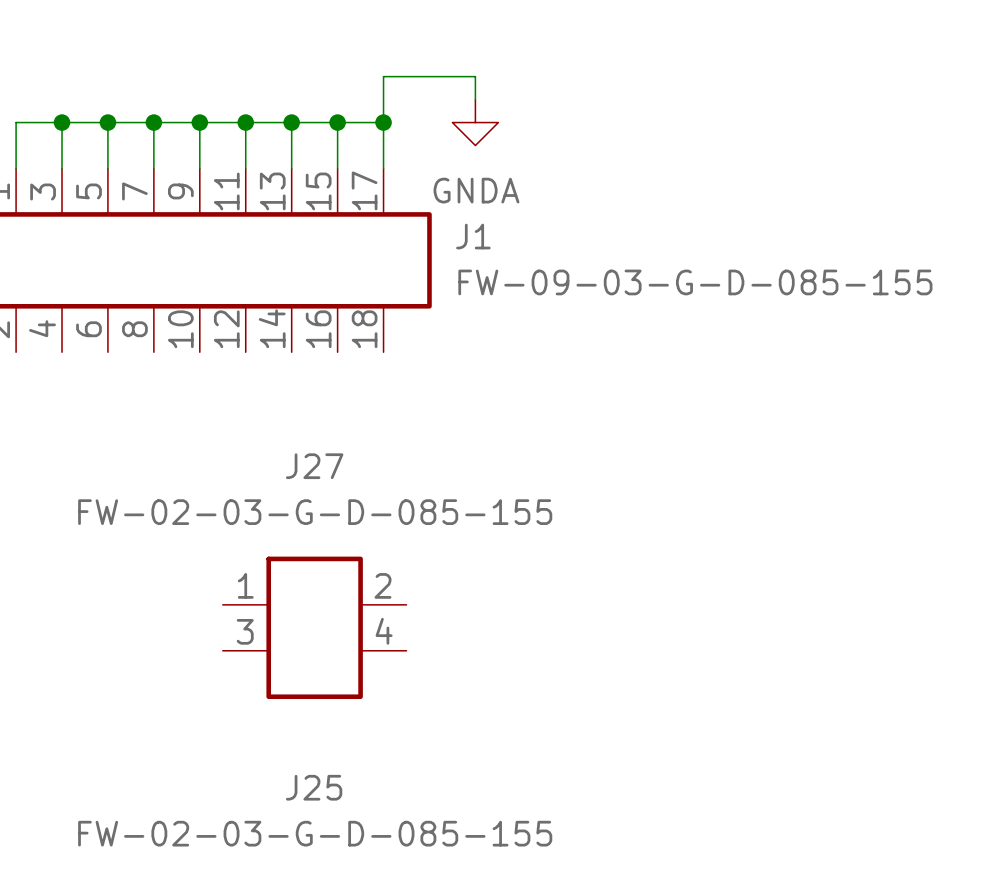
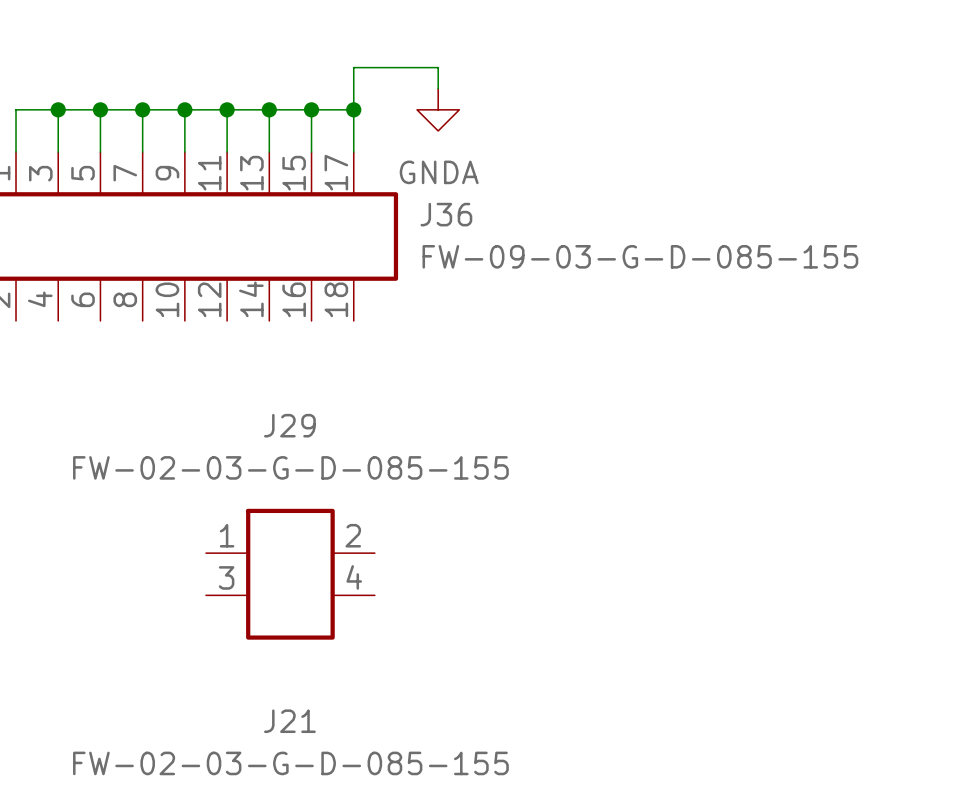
J1 name: J1 (473, 236) -> J36 (446, 214)
J27 name: J27 (314, 466) -> J29 (289, 425)
J25 name: J25 (314, 787) -> J21 (289, 721)

